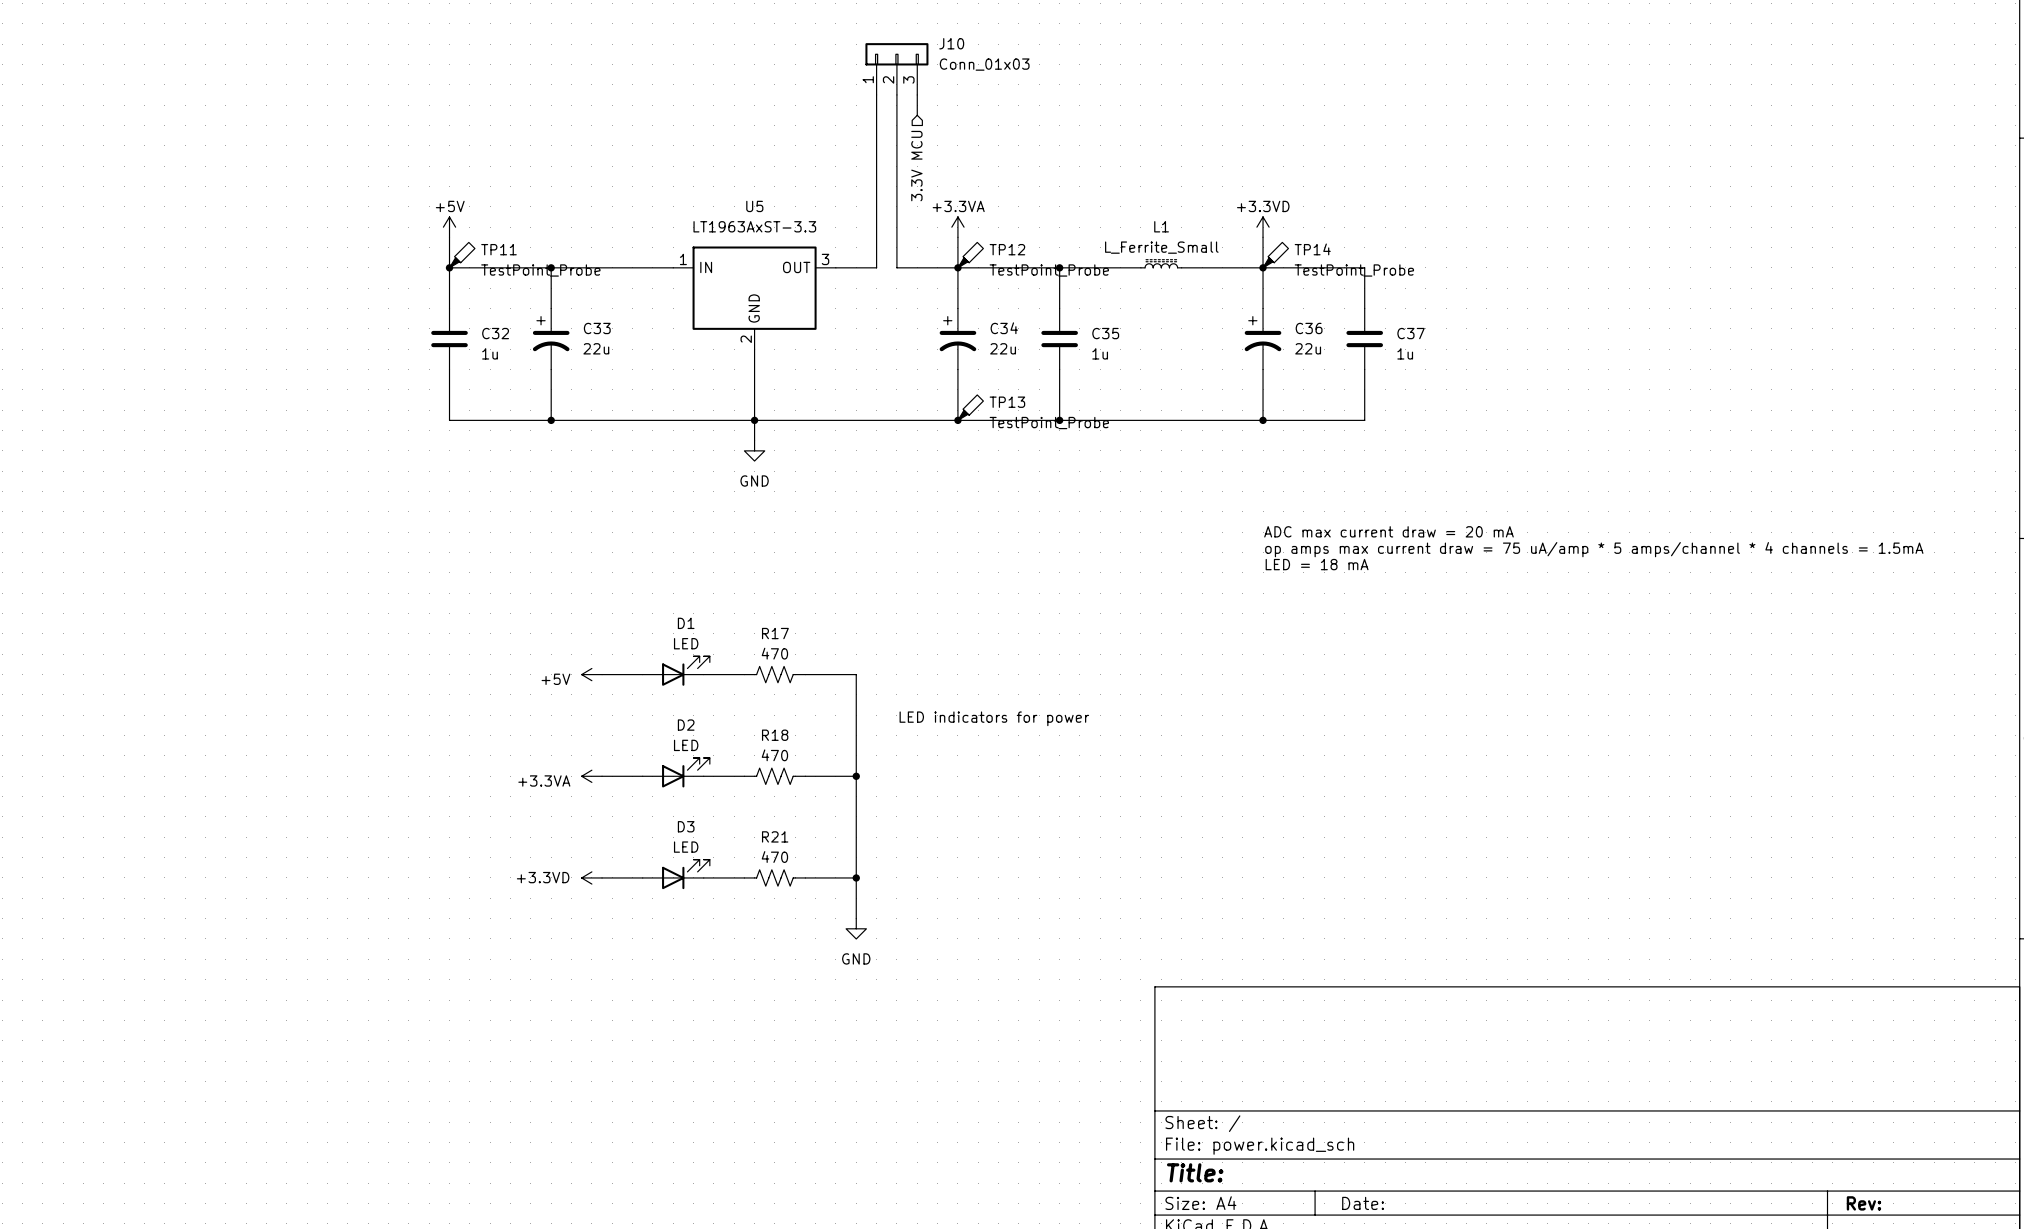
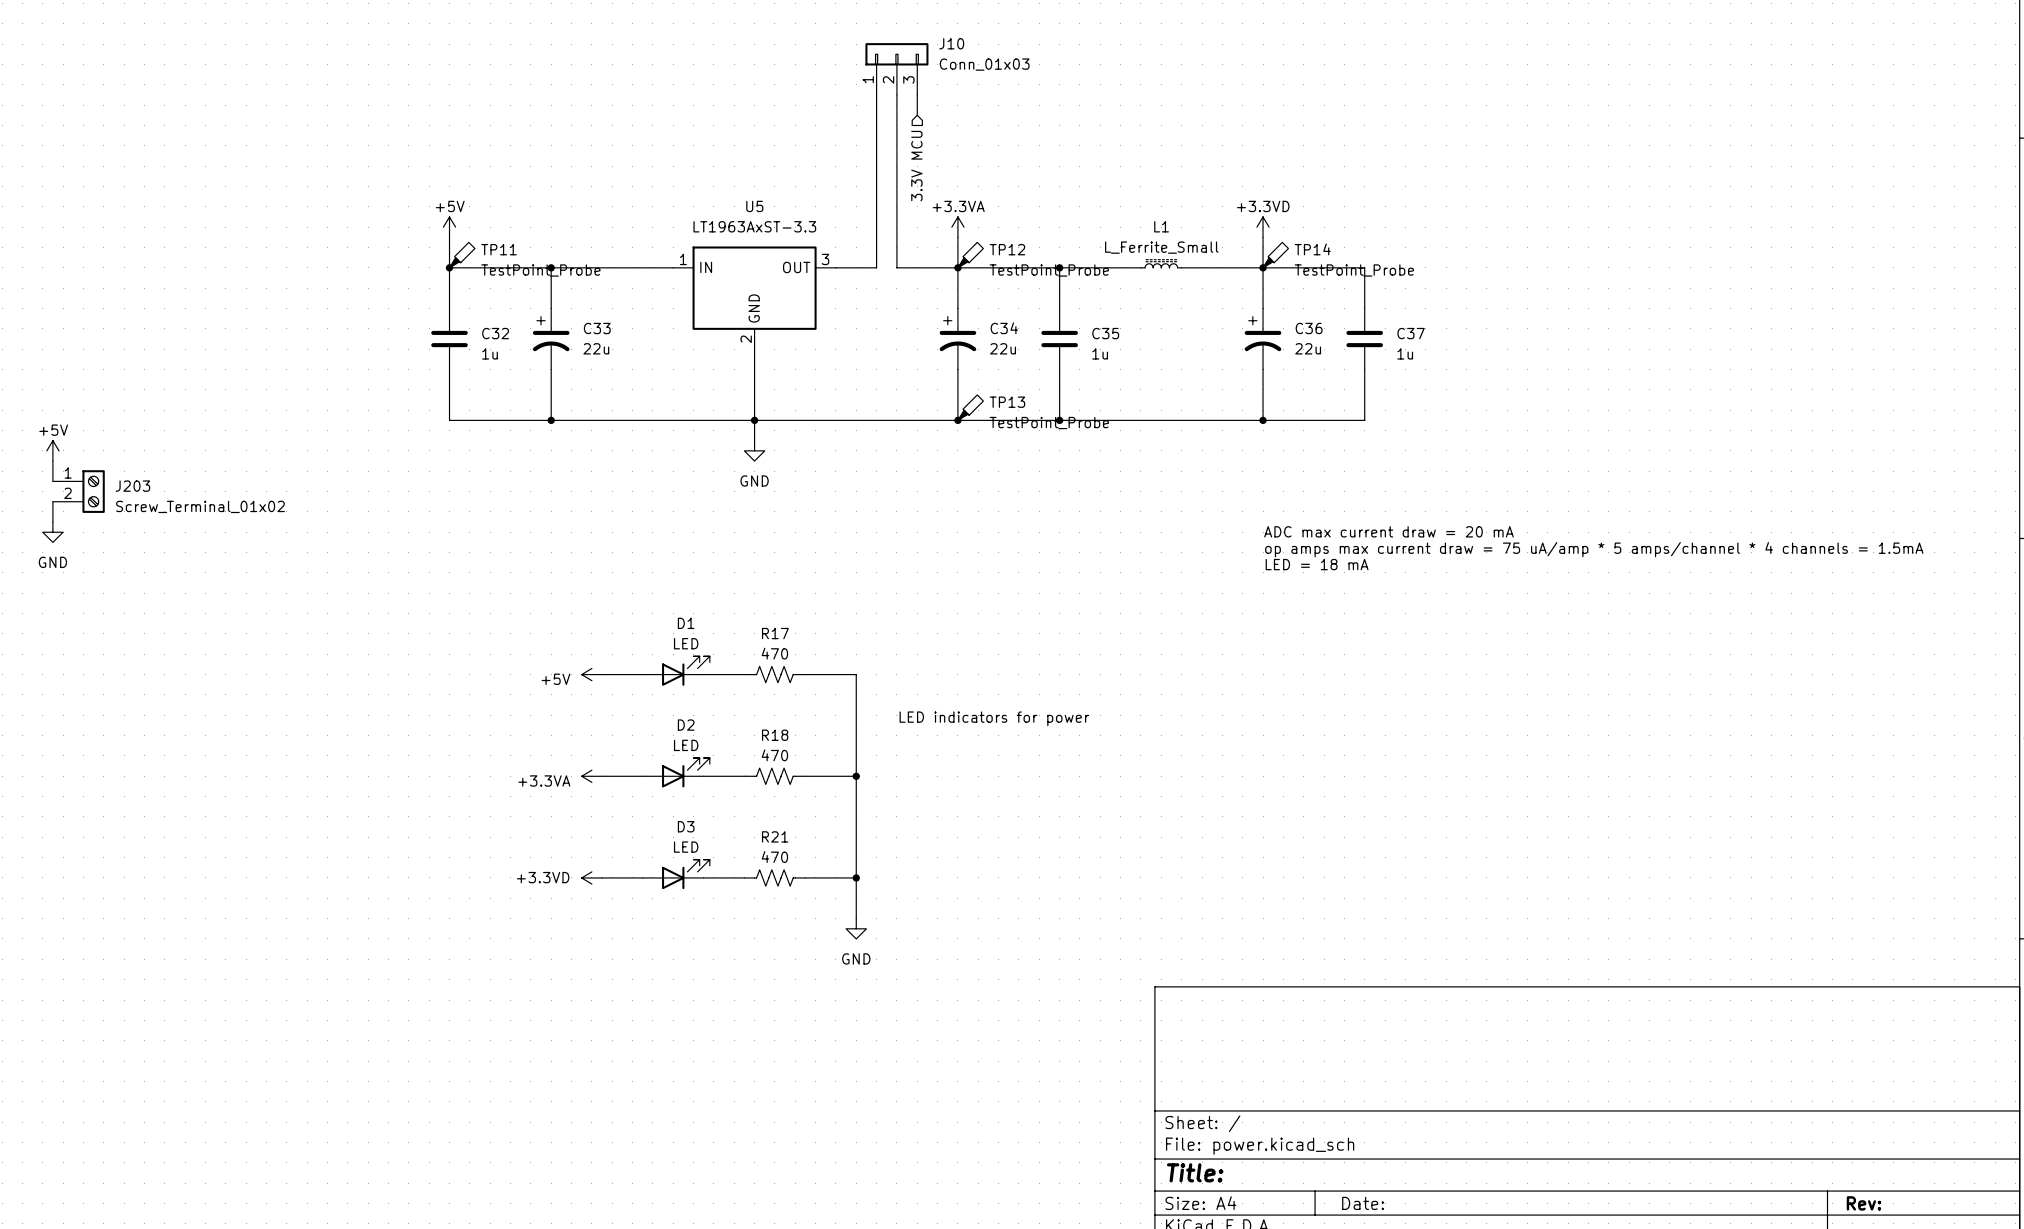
power symbol: none -> +5V (52, 450)
wire: none -> (52, 461) (52, 481)
J203: none -> Screw_Terminal_01x02 (78, 491)
wire: none -> (52, 501) (52, 522)
power symbol: none -> GND (52, 532)

